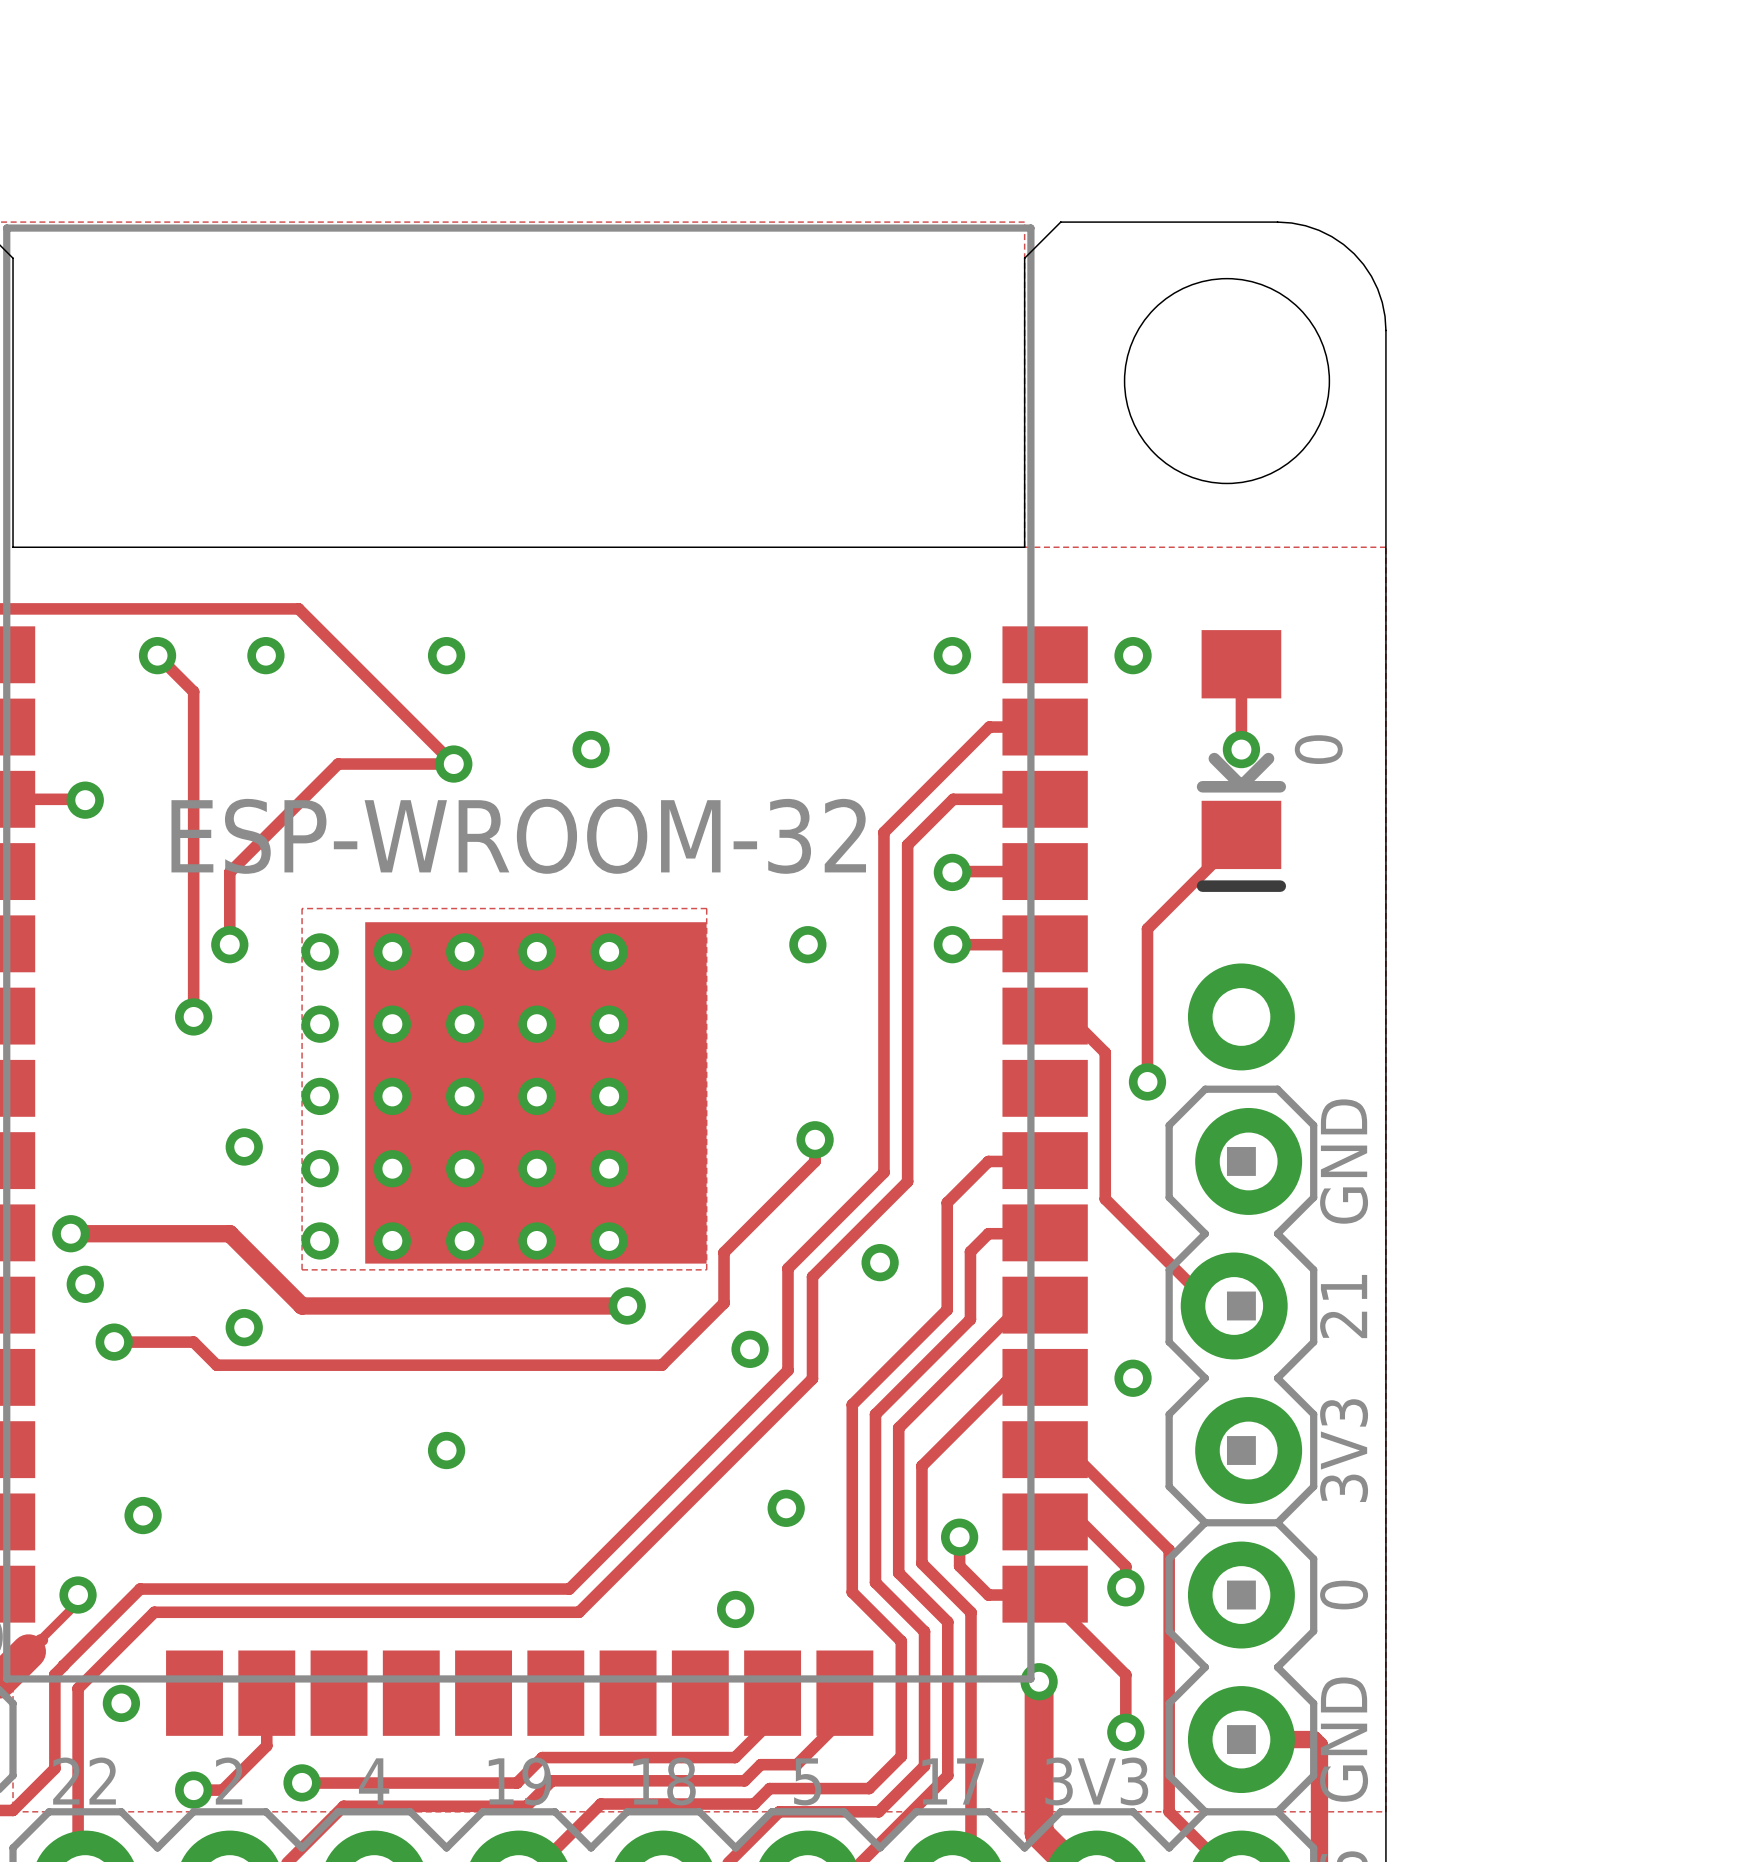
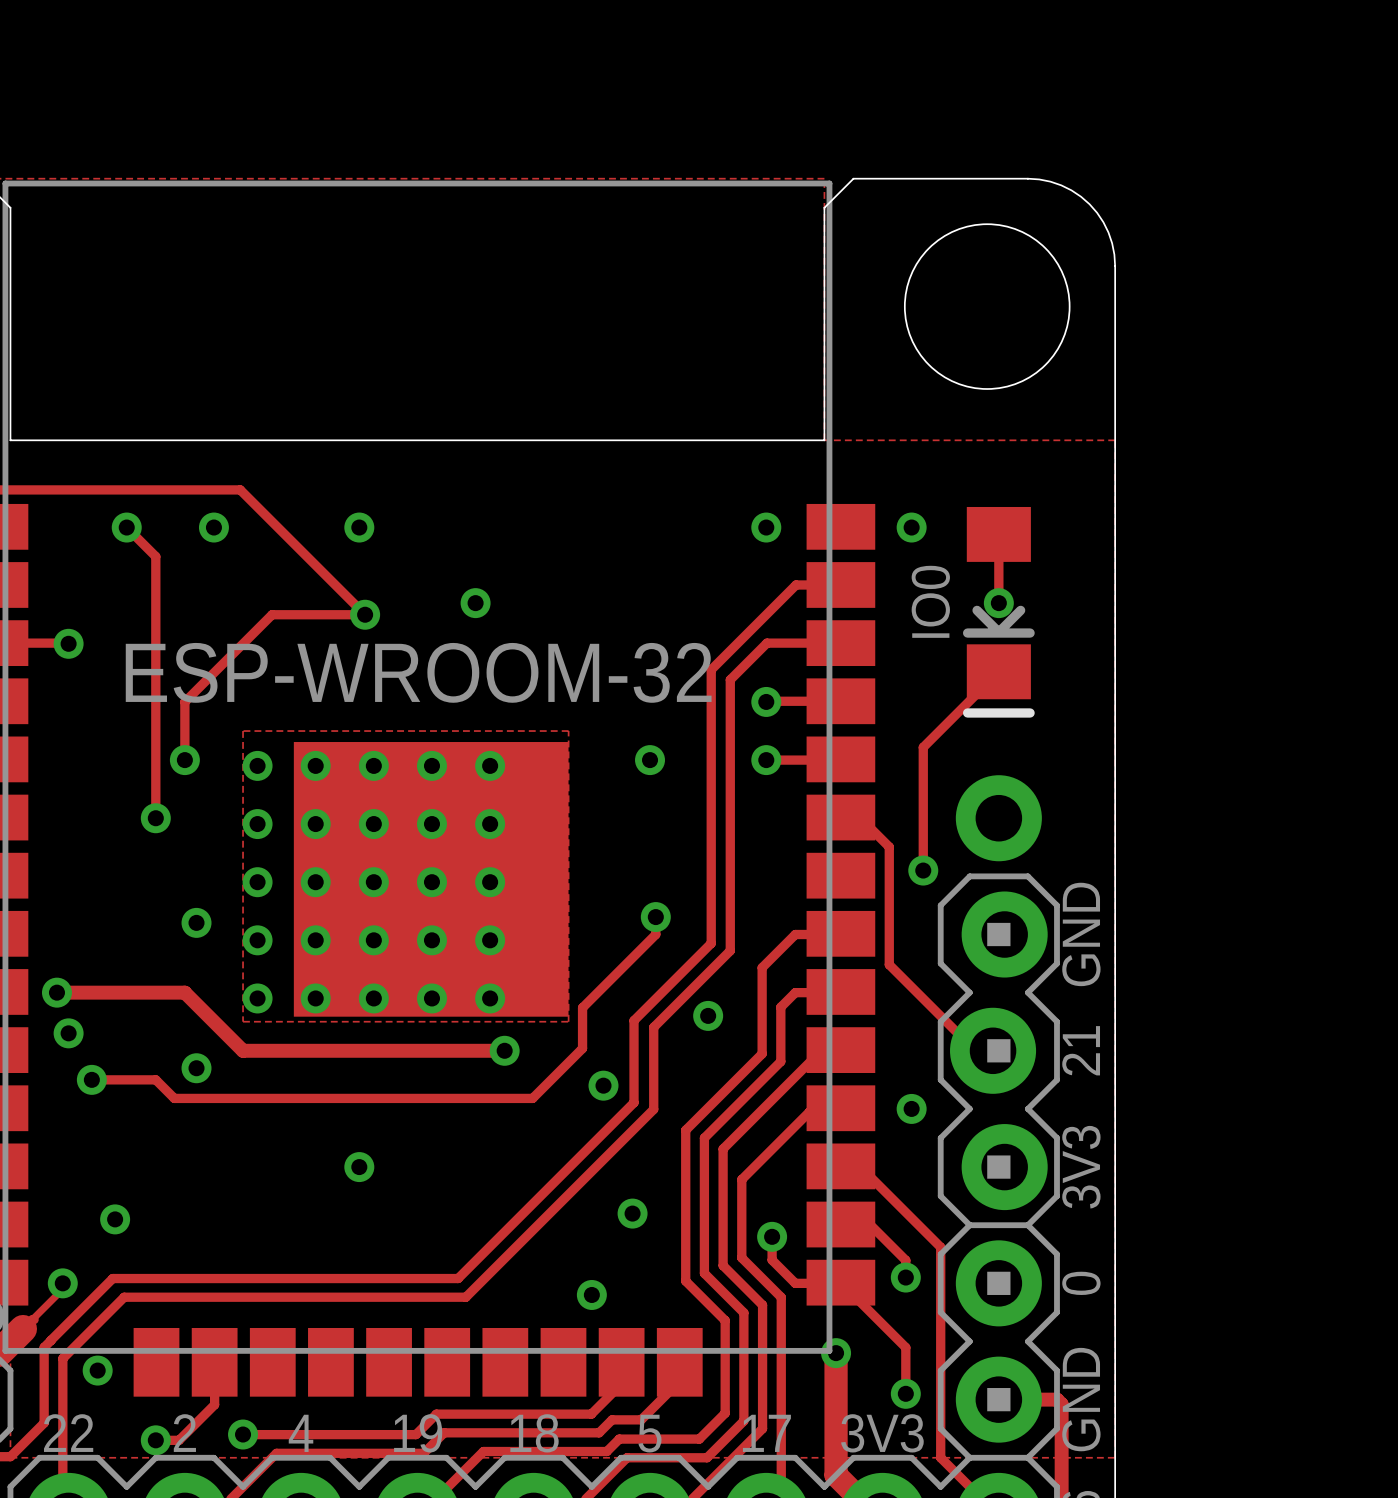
text: none -> IO0 (930, 601)
text: 0 (1318, 749) -> none

